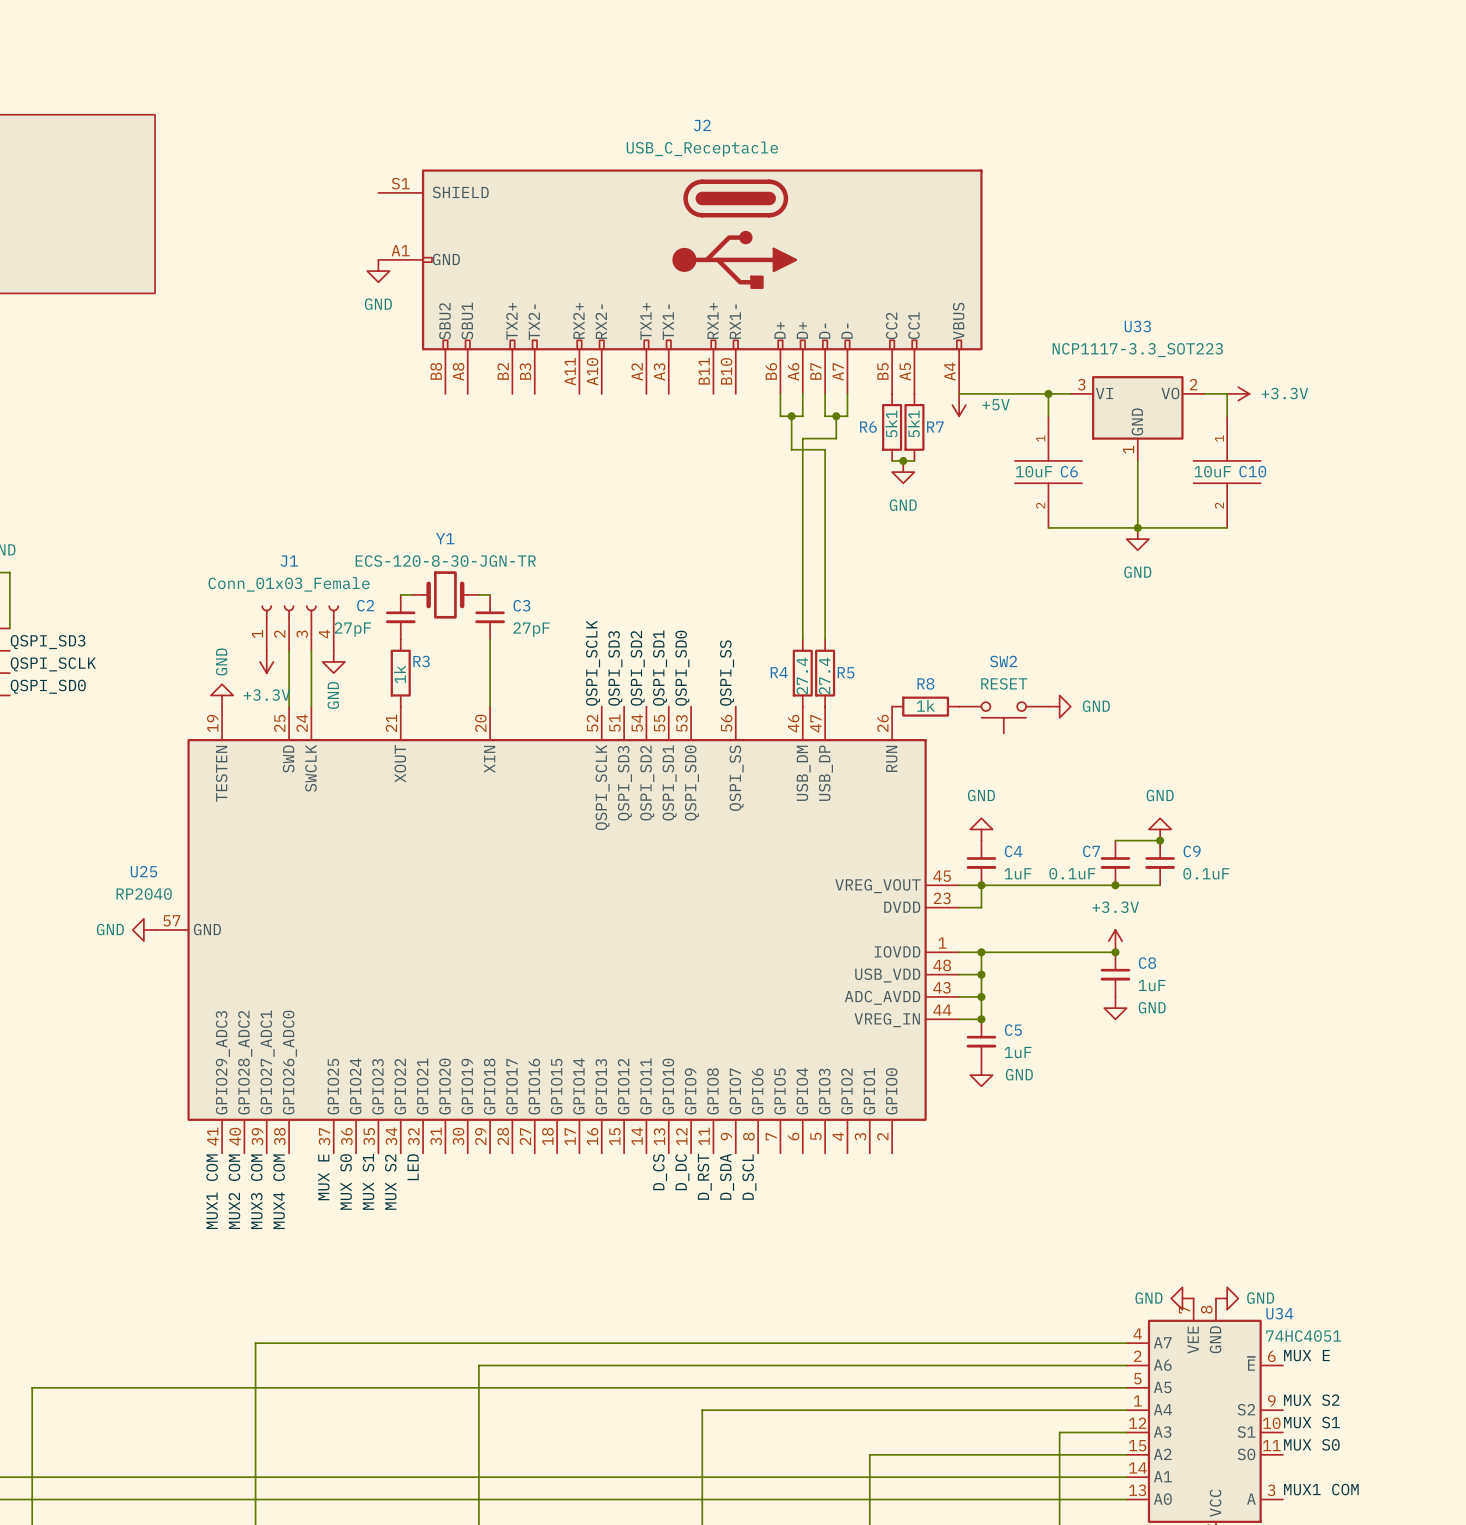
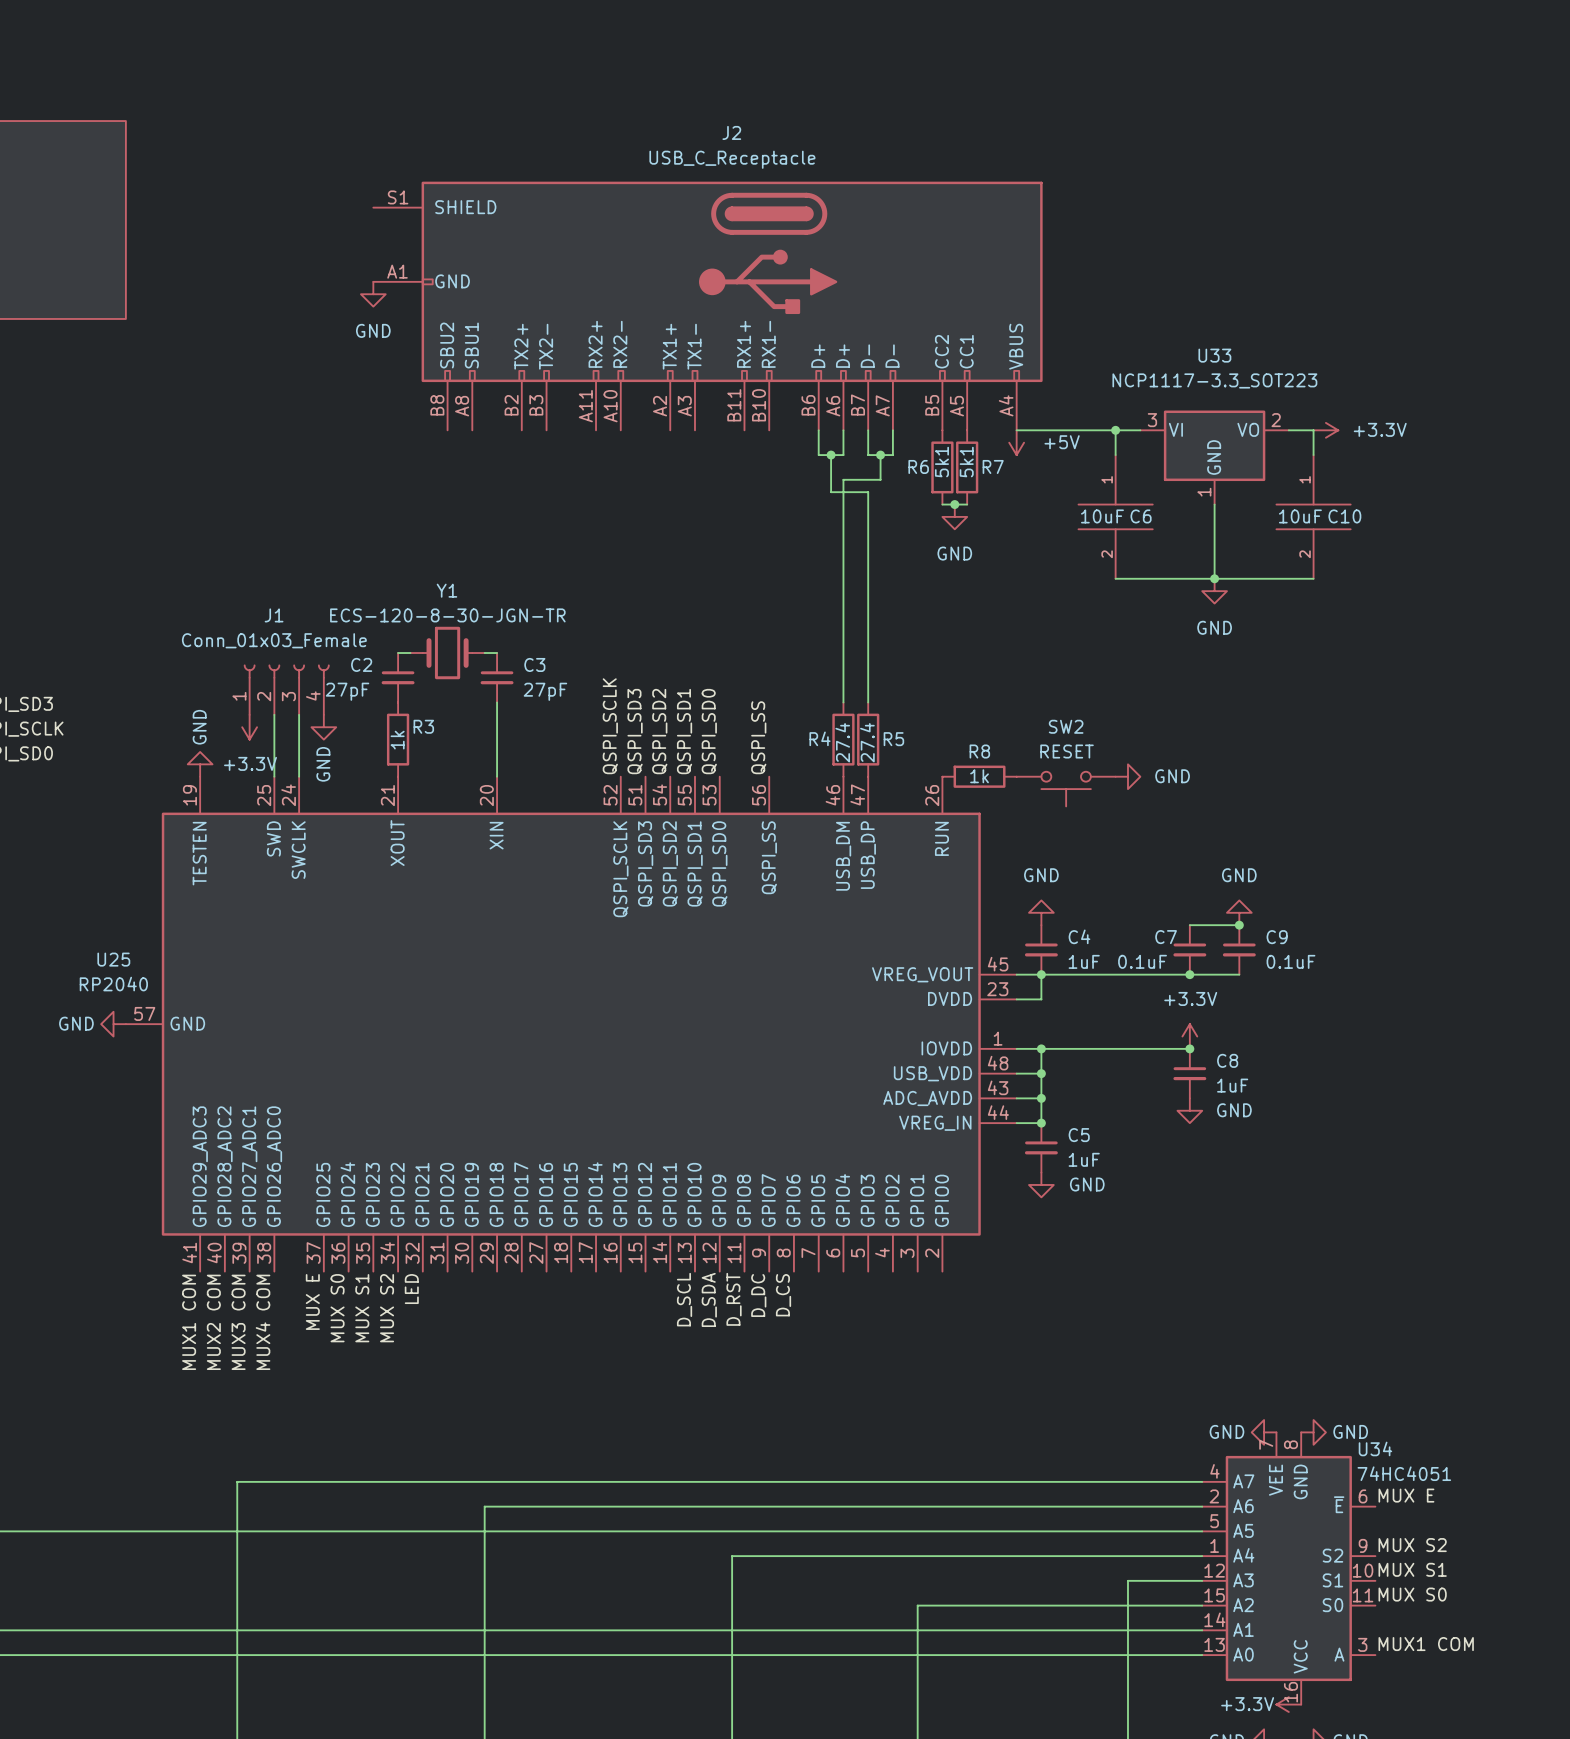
label: D_CS (660, 1172) -> D_SCL (684, 1299)
label: D_DC (682, 1172) -> D_SDA (709, 1299)
label: D_SDA (727, 1176) -> D_DC (758, 1295)
label: D_SCL (749, 1177) -> D_CS (783, 1295)

